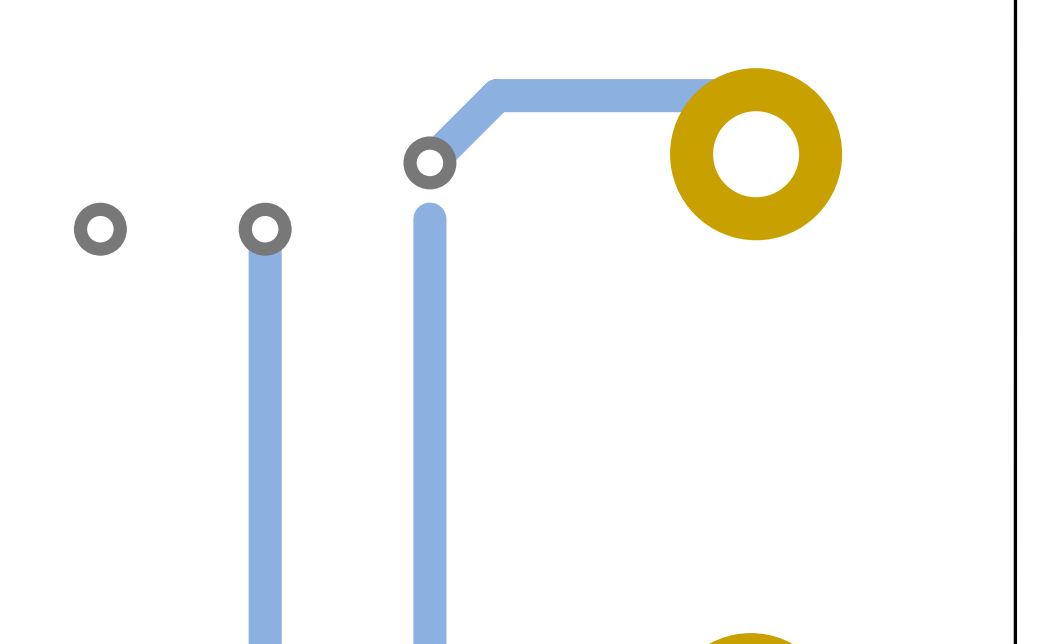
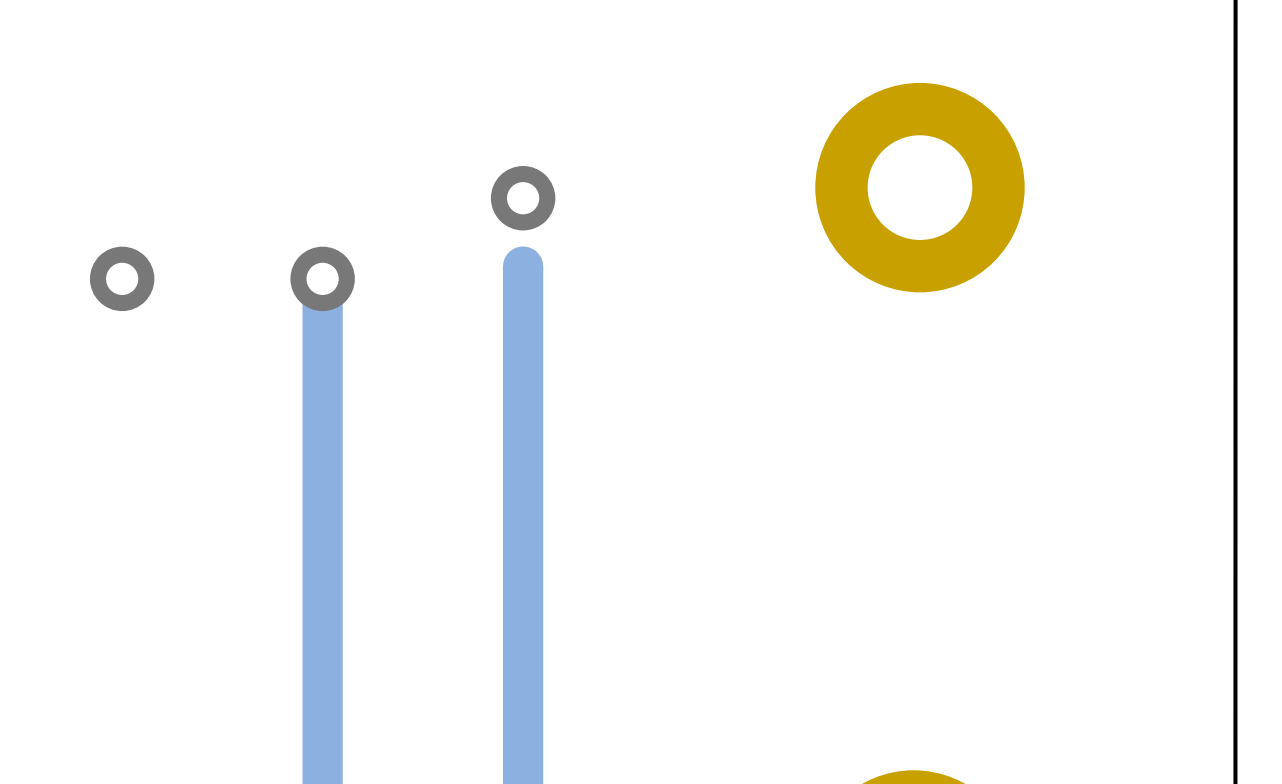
track: (756, 95) (497, 95) (429, 162) -> none

